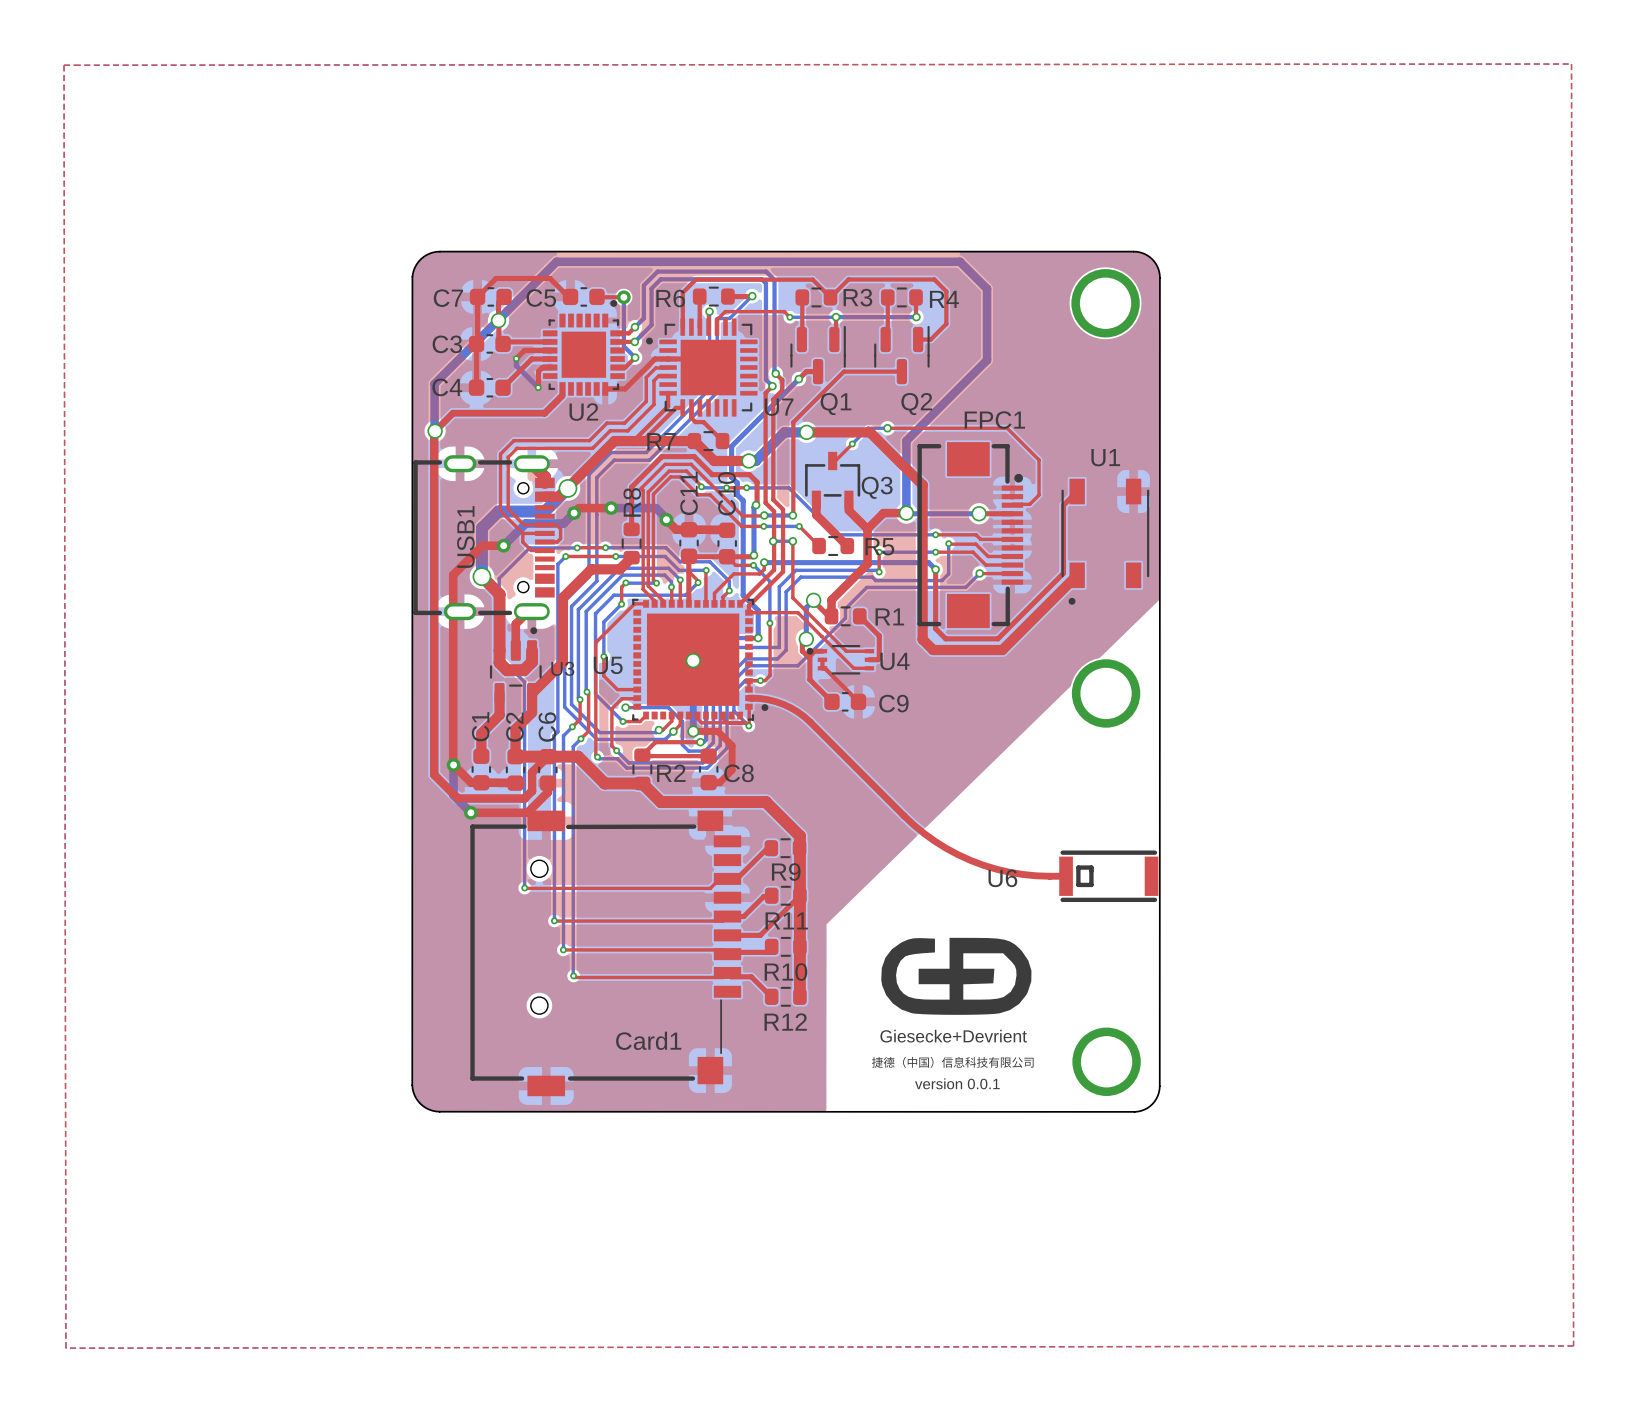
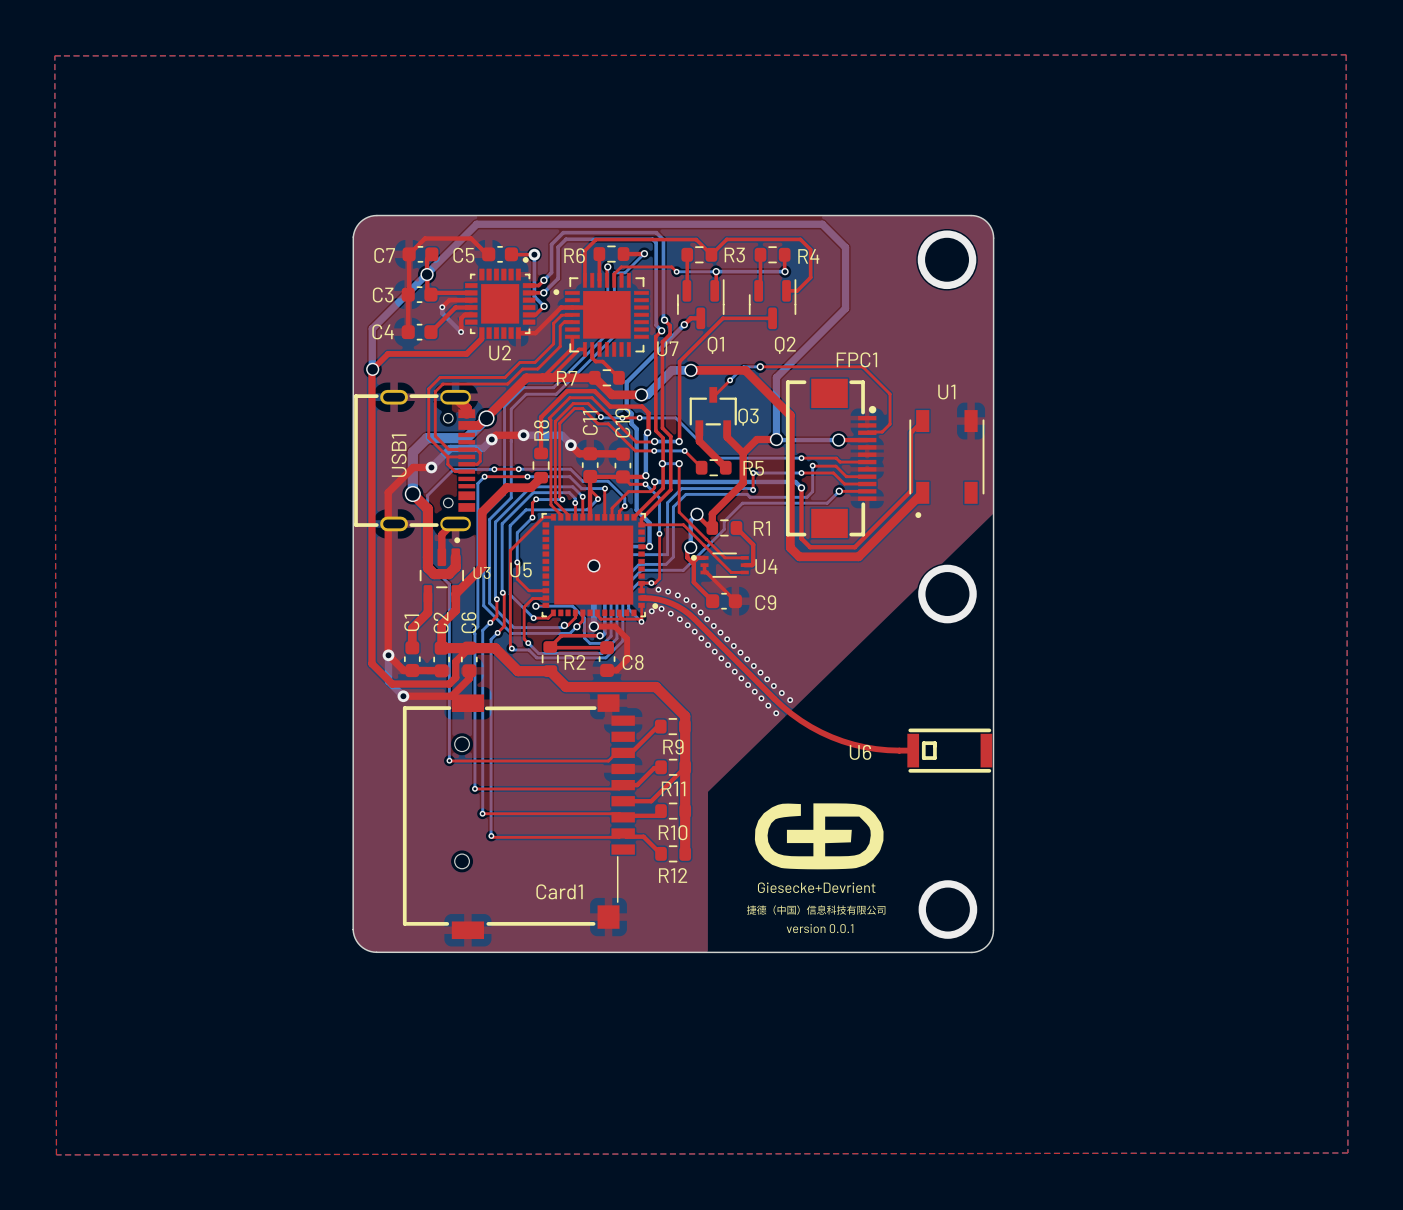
via: none -> (658, 589)
via: none -> (668, 591)
via: none -> (677, 595)
via: none -> (686, 600)
via: none -> (693, 605)
via: none -> (661, 608)
via: none -> (651, 611)
via: none -> (700, 612)
via: none -> (670, 613)
via: none -> (679, 619)
via: none -> (707, 619)
via: none -> (687, 625)
via: none -> (713, 625)
via: none -> (694, 631)
via: none -> (720, 632)
via: none -> (701, 638)
via: none -> (727, 639)
via: none -> (708, 645)
via: none -> (733, 645)
via: none -> (714, 651)
via: none -> (740, 652)
via: none -> (721, 658)
via: none -> (747, 659)
via: none -> (728, 665)
via: none -> (753, 665)
via: none -> (734, 671)
via: none -> (760, 672)
via: none -> (741, 678)
via: none -> (767, 679)
via: none -> (748, 685)
via: none -> (773, 685)
via: none -> (754, 691)
via: none -> (781, 693)
via: none -> (761, 698)
via: none -> (790, 700)
via: none -> (768, 705)
via: none -> (776, 713)

